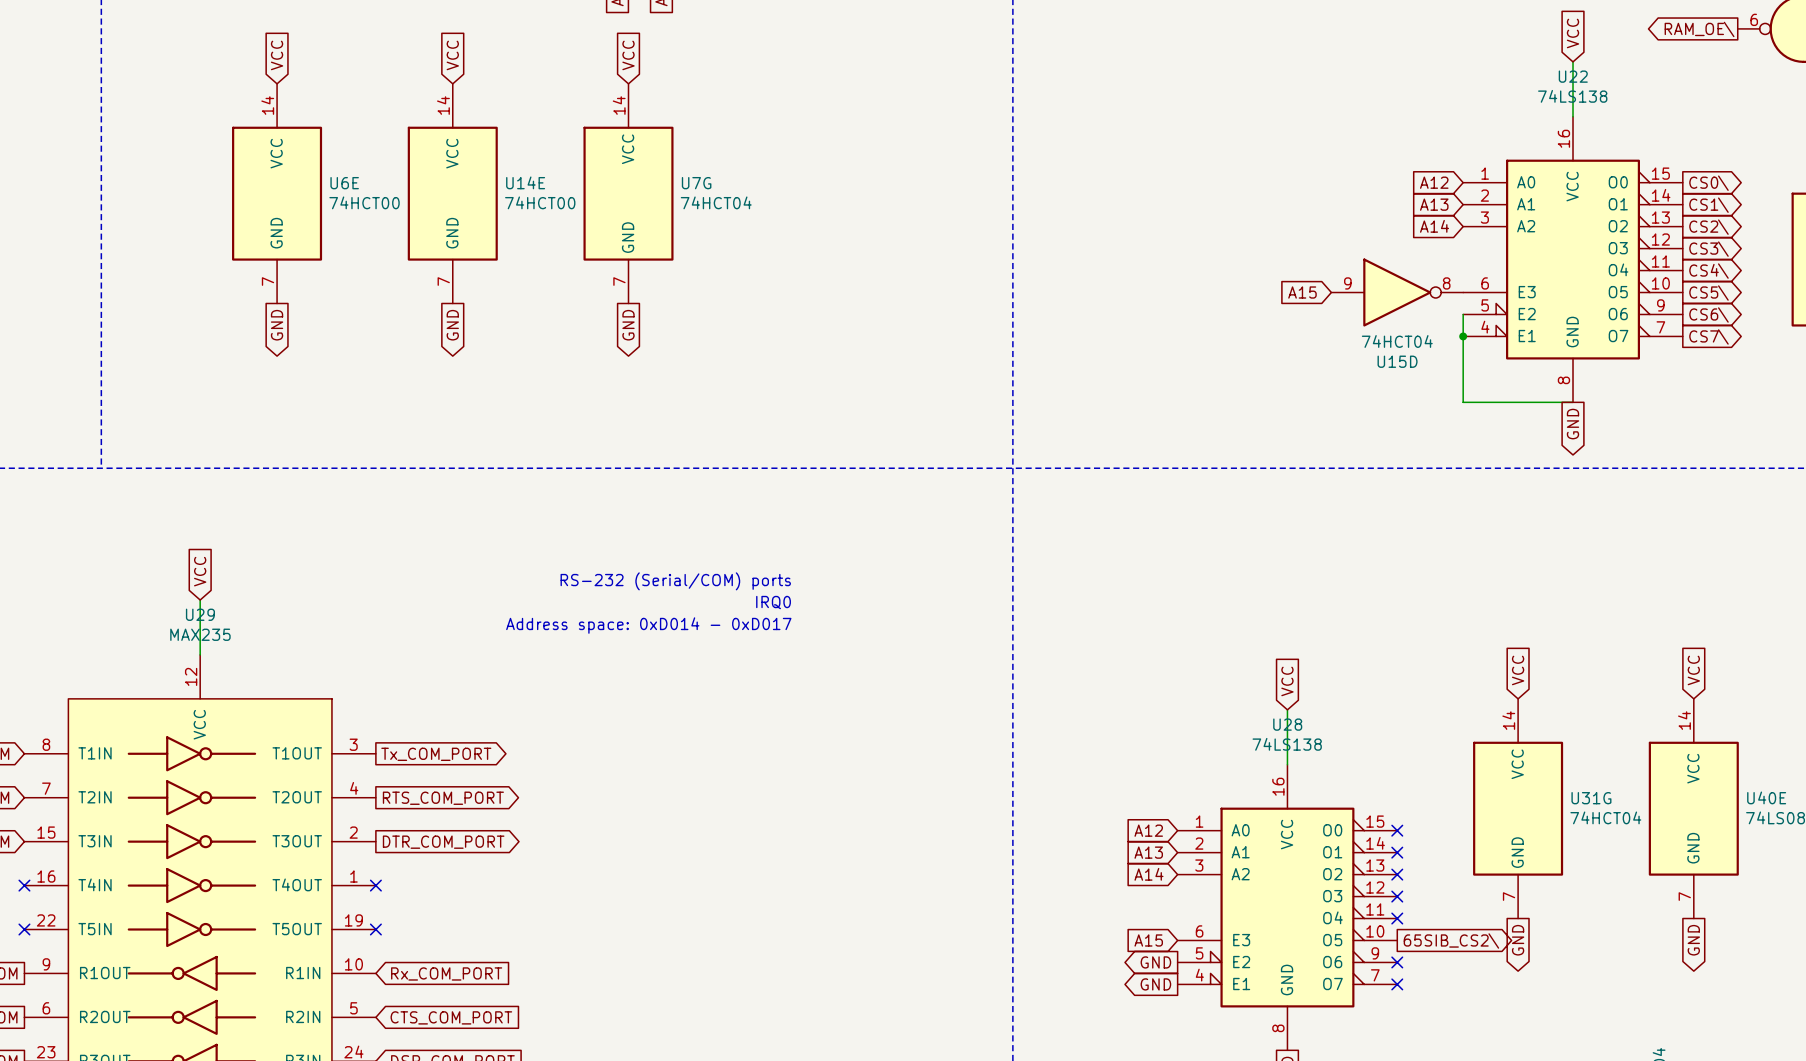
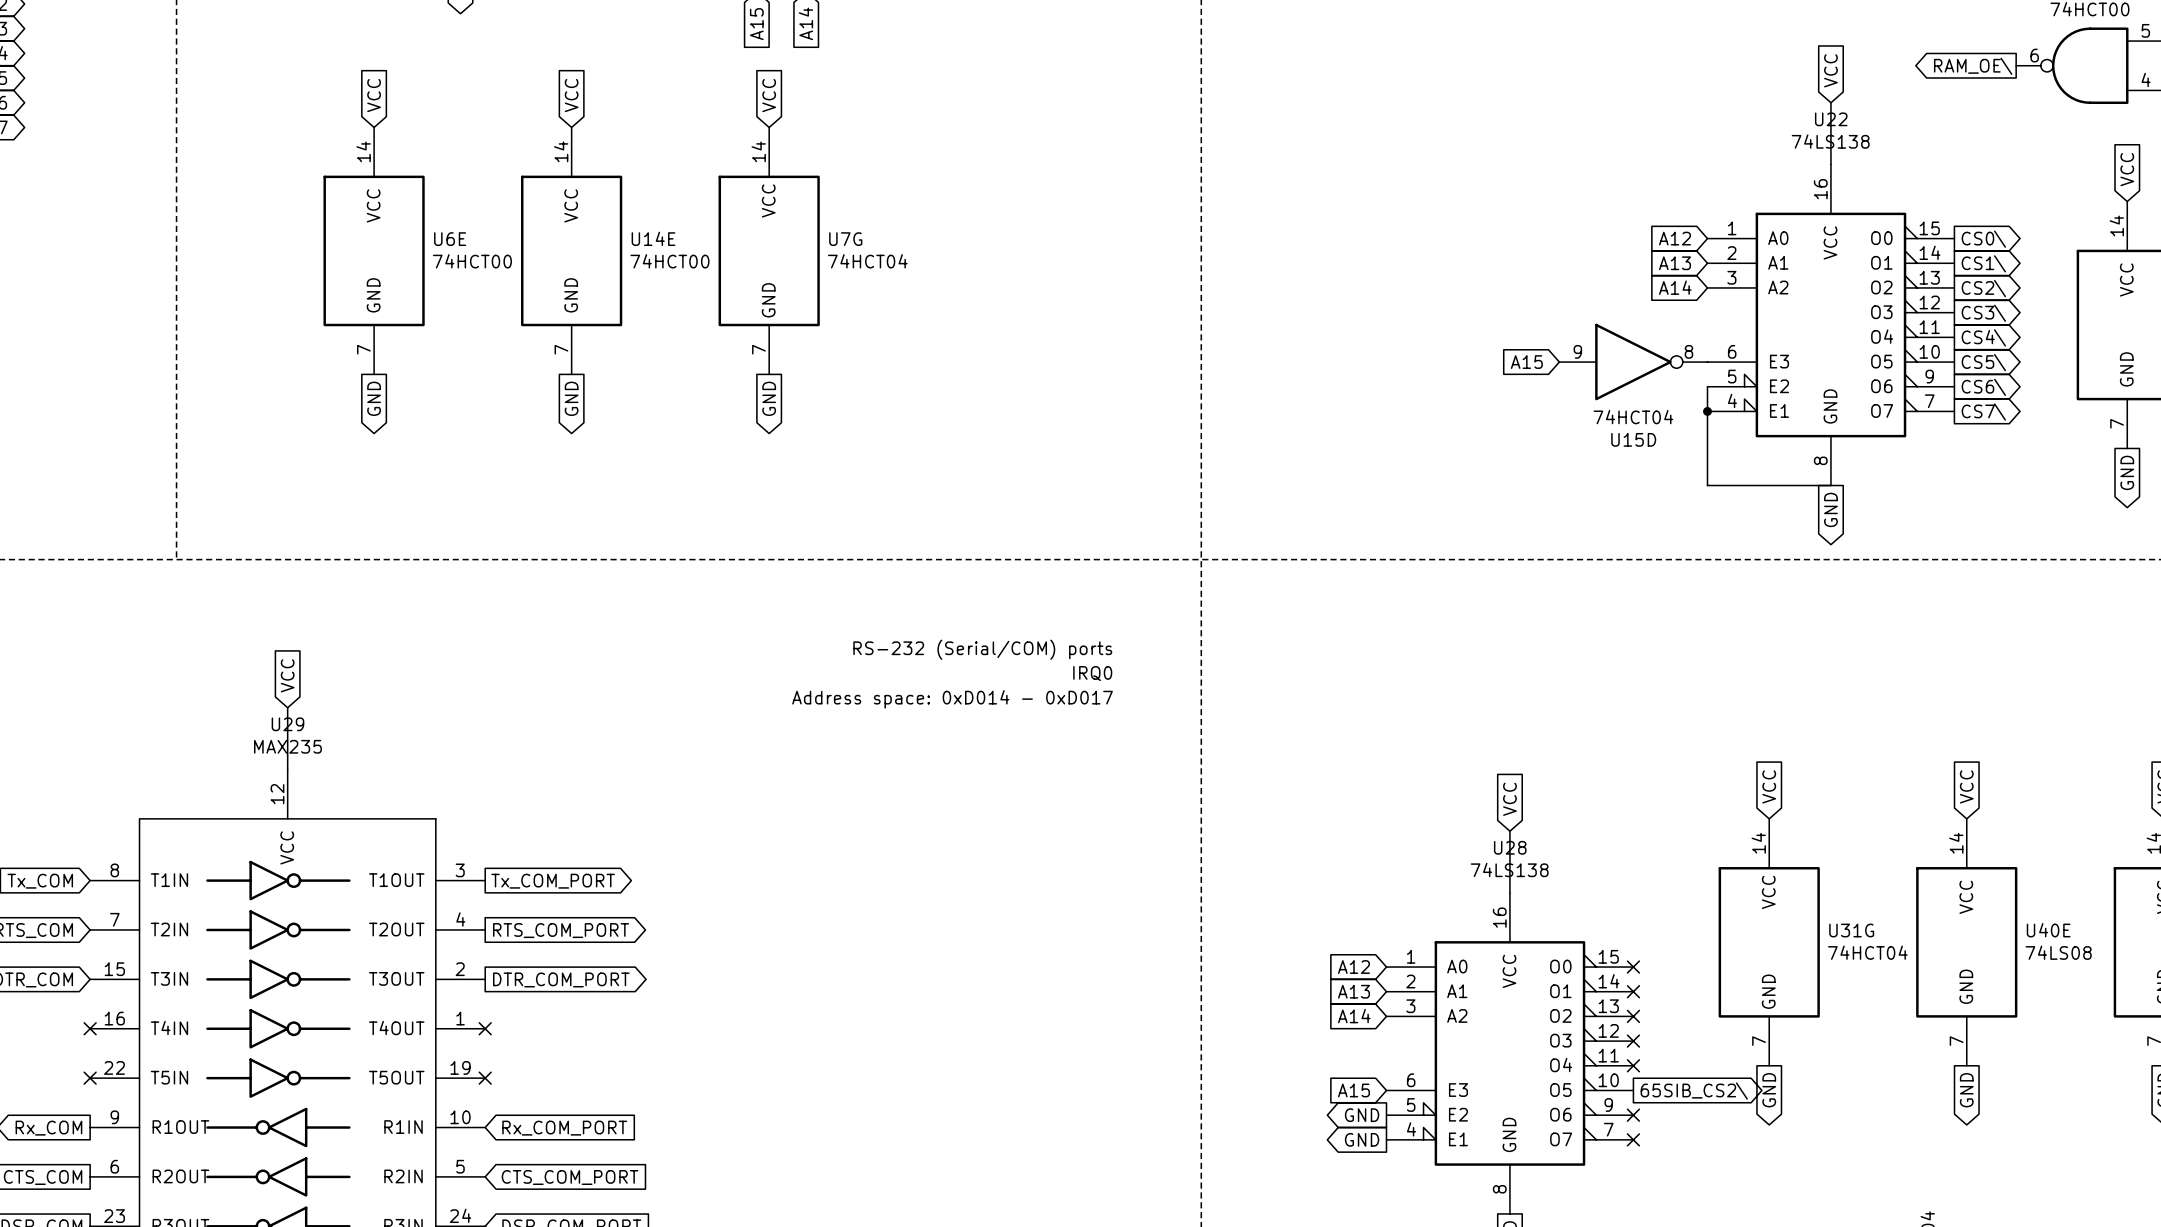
text position: RS-232 (Serial/COM) ports (675, 581) -> RS-232 (Serial/COM) ports (982, 649)
text position: IRQ0 (773, 602) -> IRQ0 (1092, 673)
text position: Address space: 0xD014 - 0xD017 (648, 625) -> Address space: 0xD014 - 0xD017 (952, 699)

